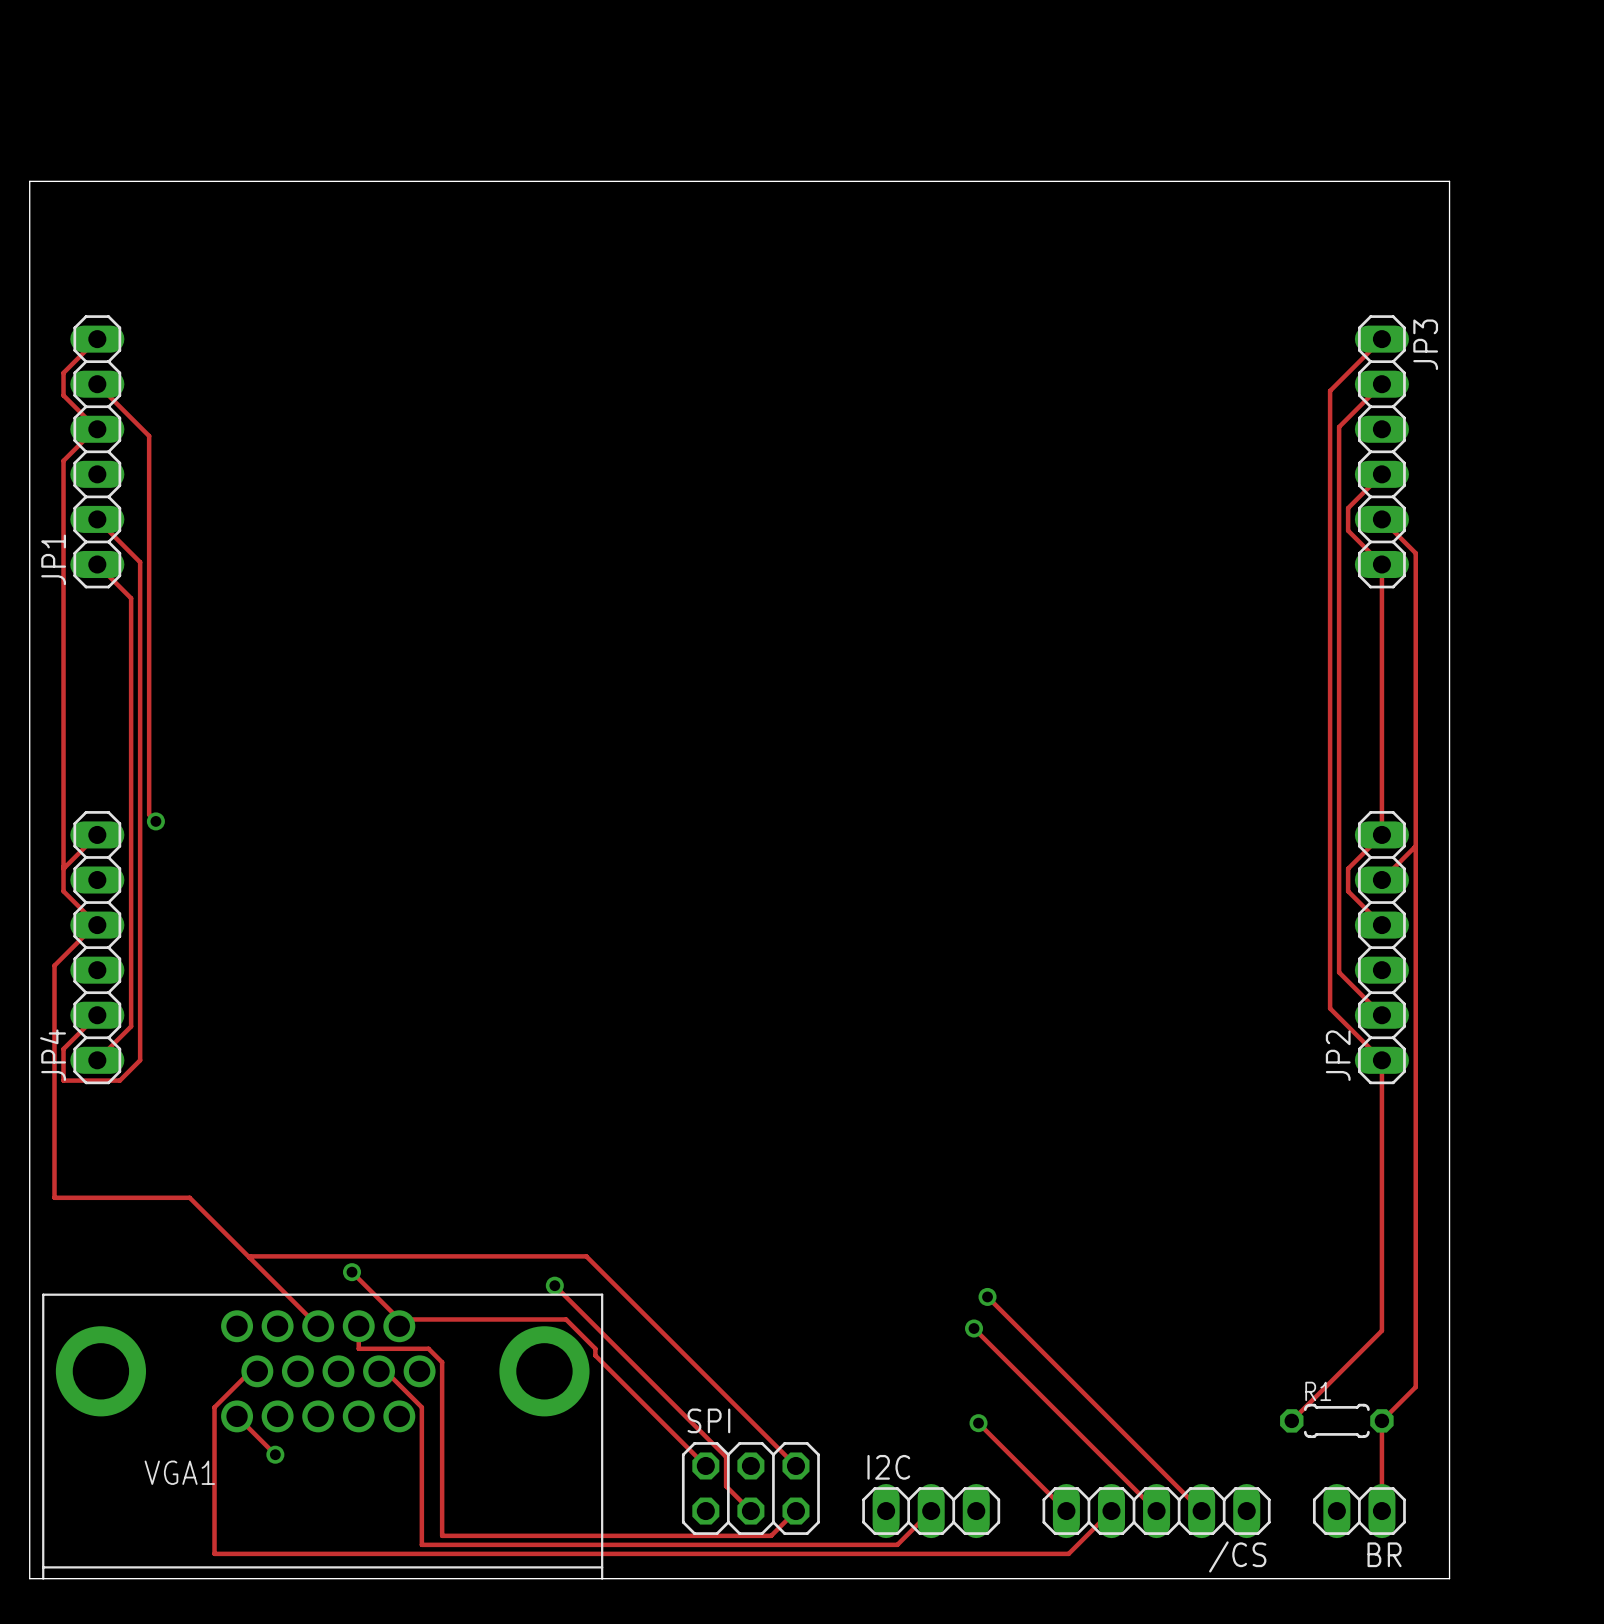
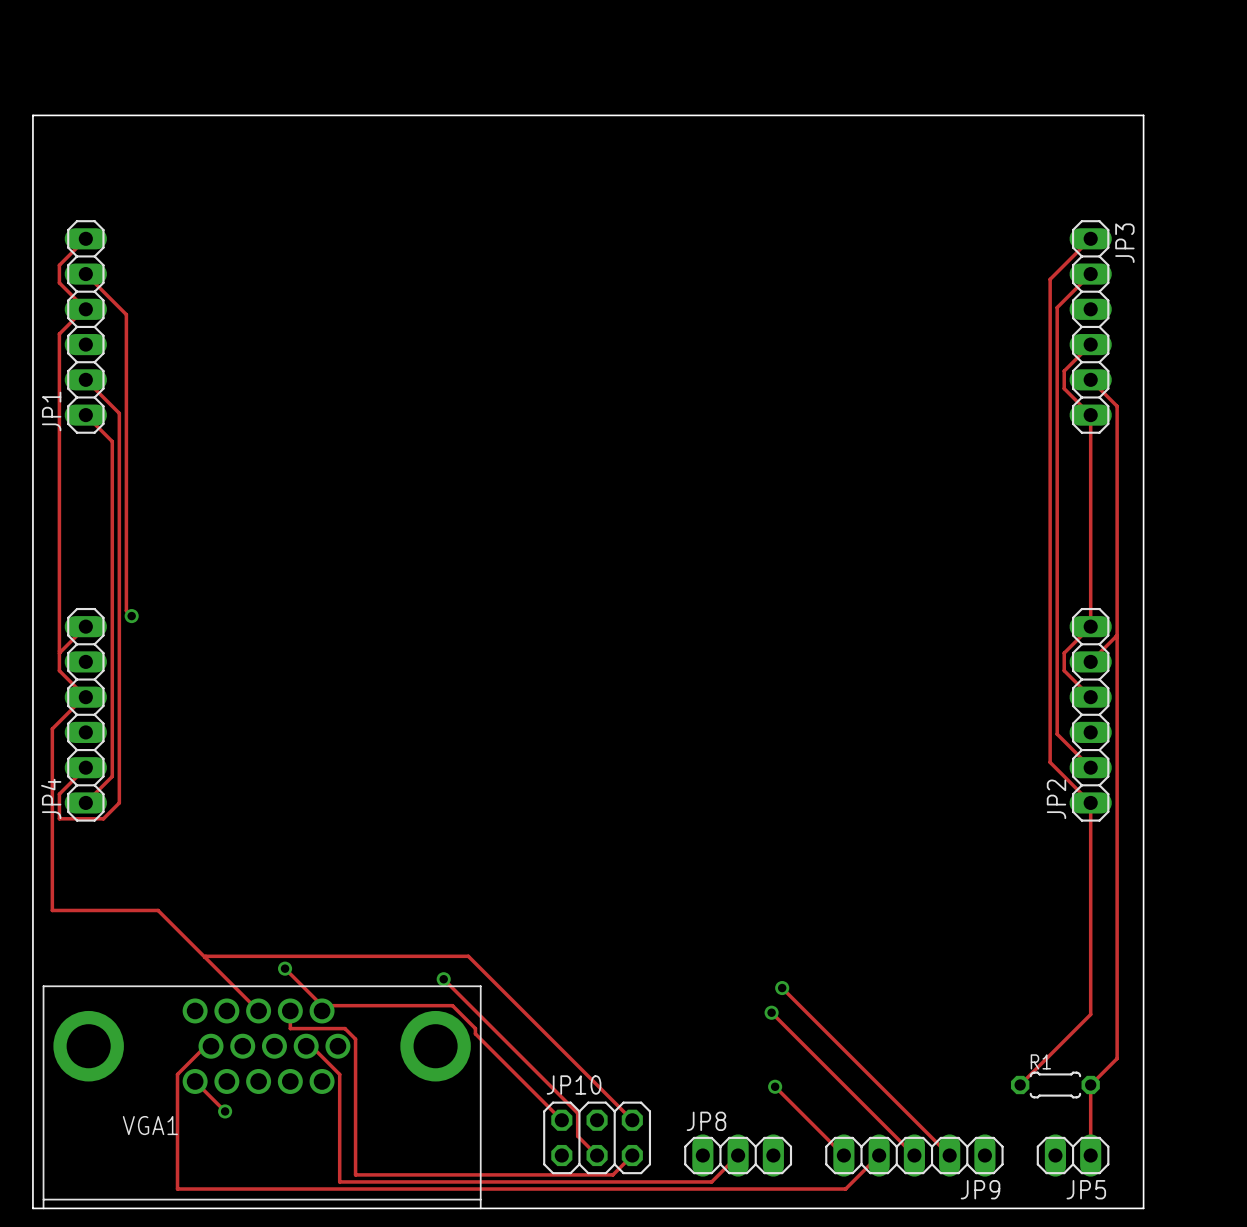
SPI name: SPI (708, 1420) -> JP10 (574, 1085)
I2C name: I2C (888, 1467) -> JP8 (706, 1121)
BR name: BR (1384, 1554) -> JP5 (1086, 1189)
/CS name: /CS (1237, 1556) -> JP9 (980, 1189)

